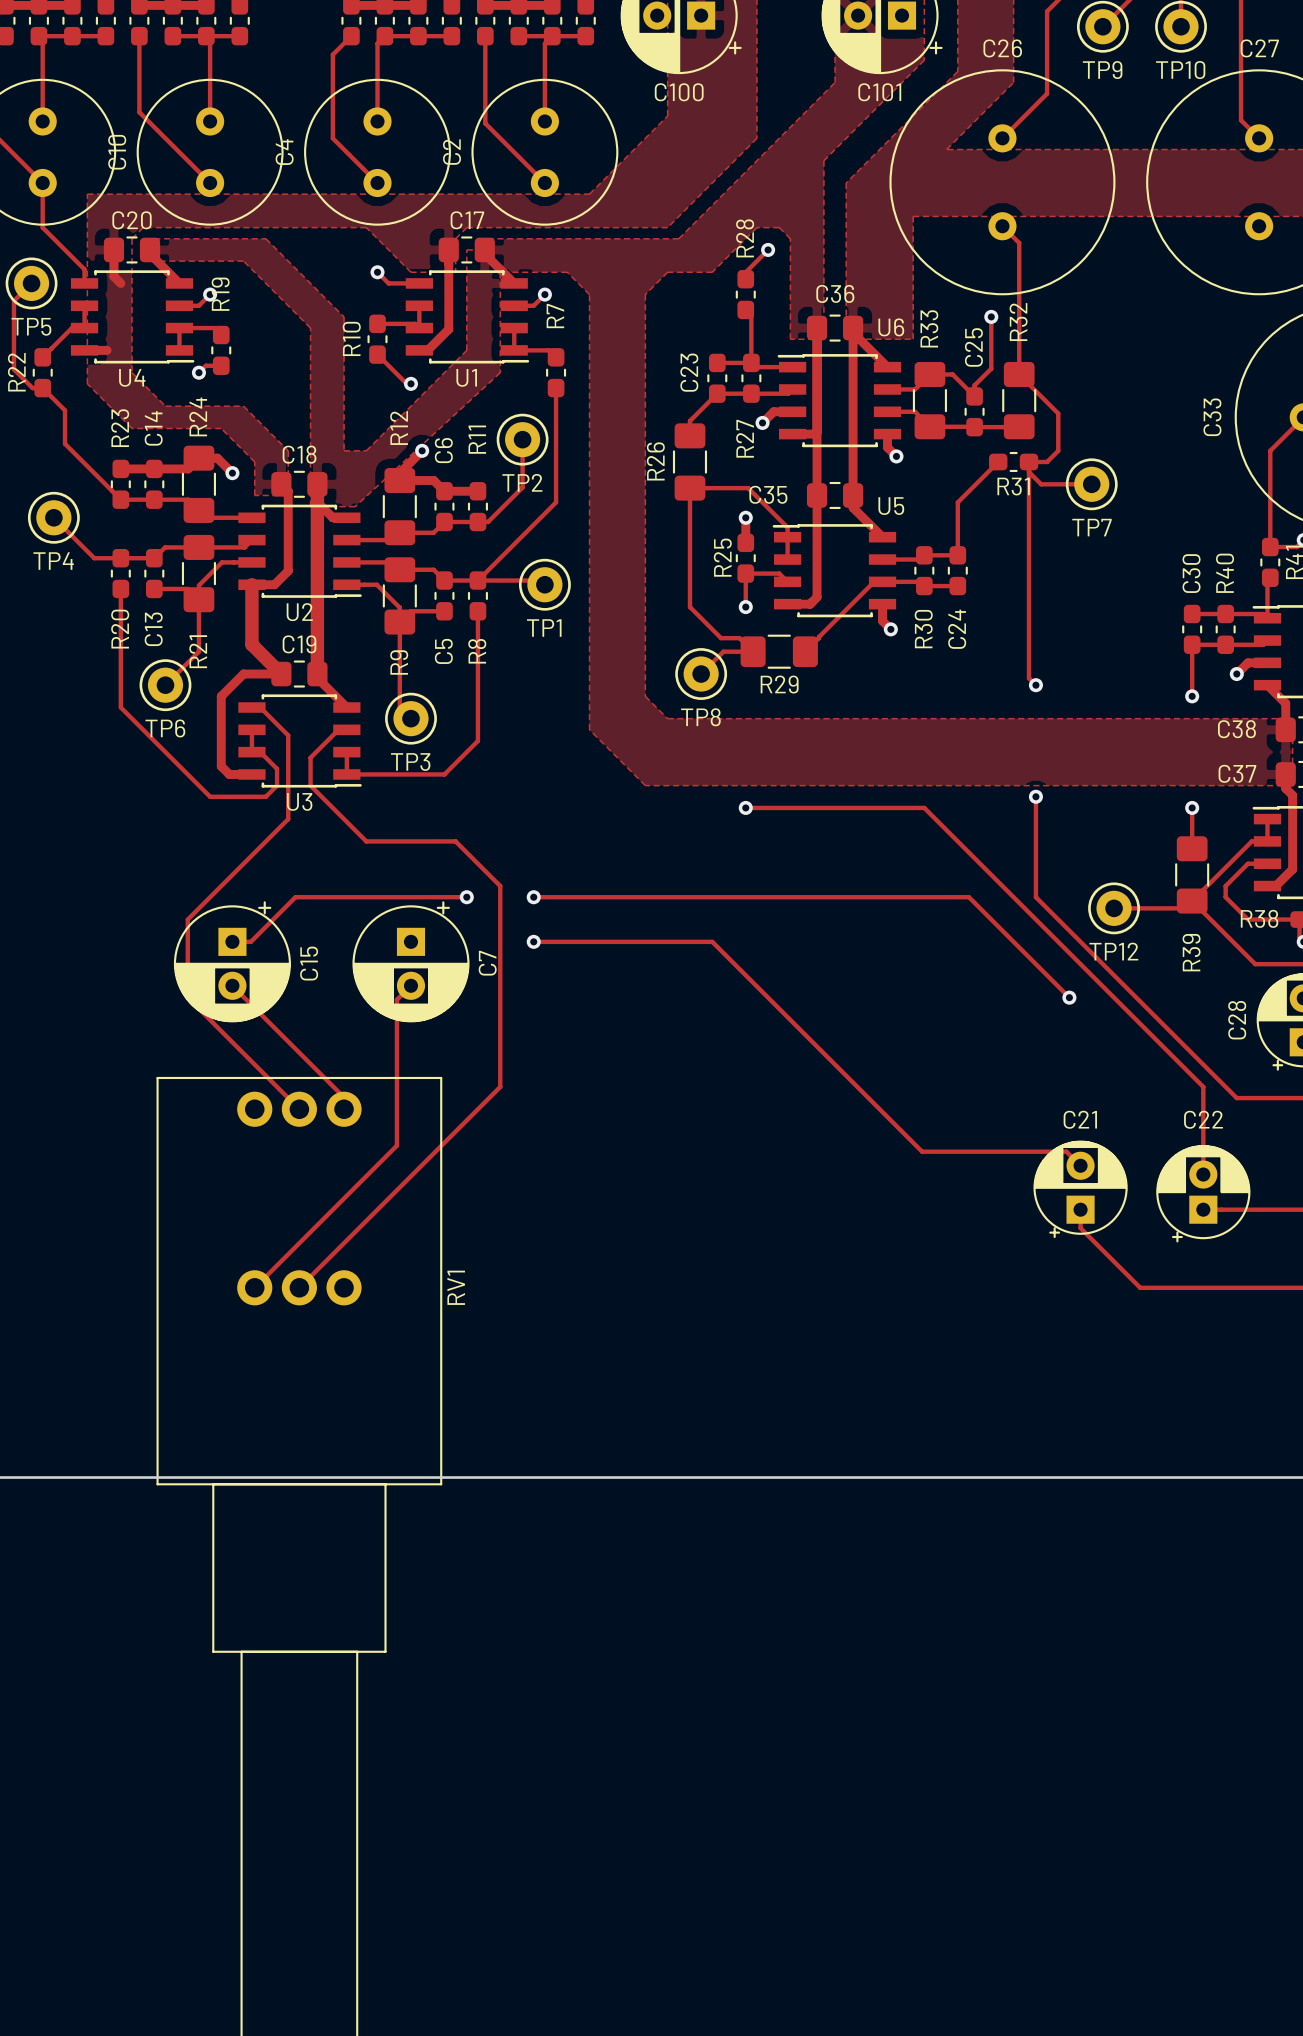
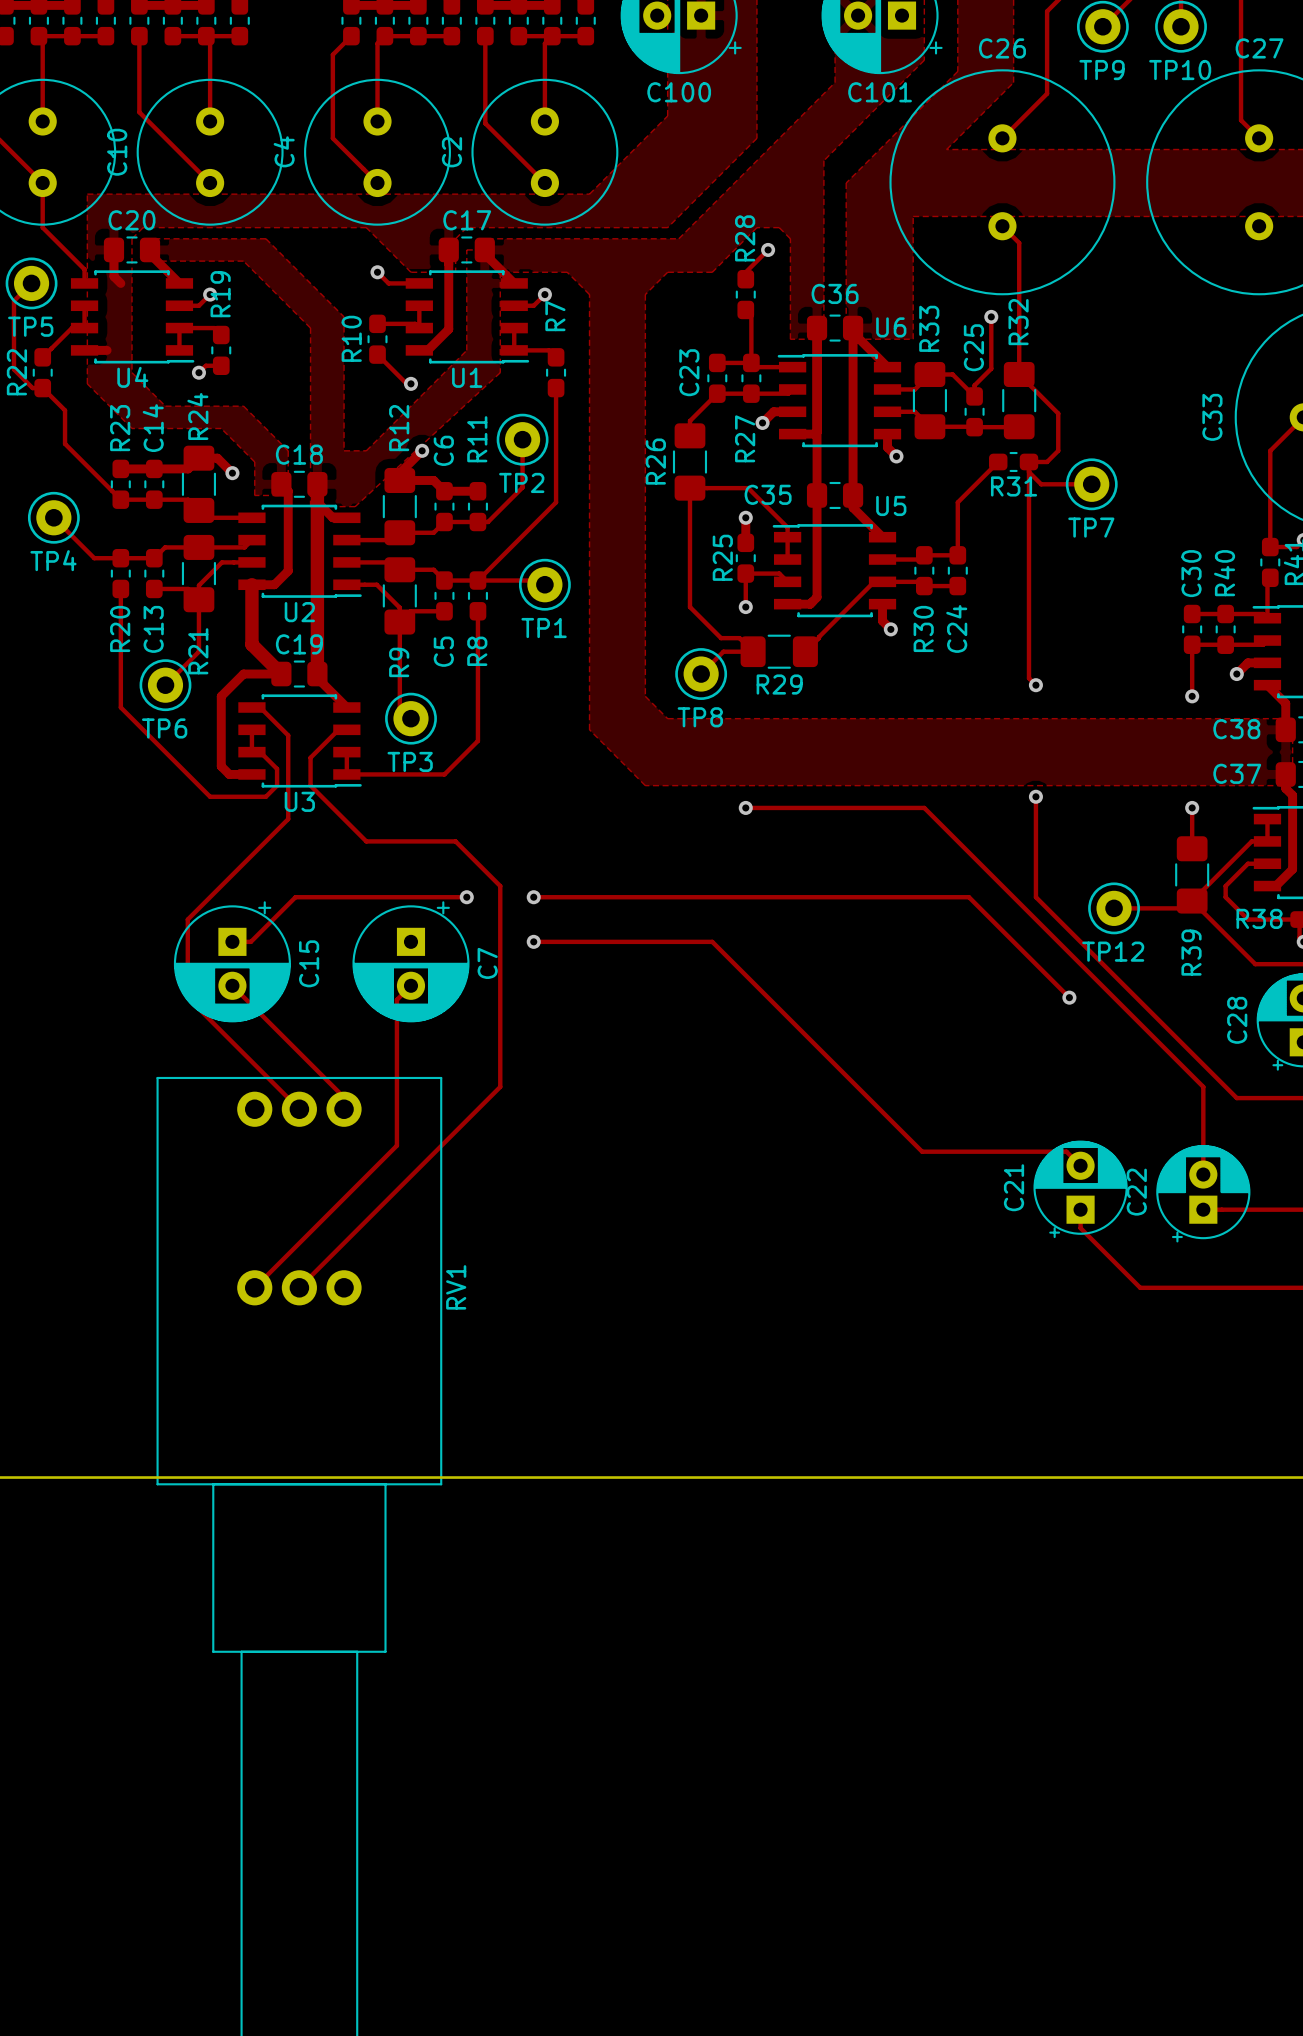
C21 name rotation: 0° (1080, 1119) -> 90° counterclockwise (1014, 1187)
C21 name position: C21 (1080, 1119) -> C21 (1014, 1187)
C22 name rotation: 0° (1203, 1119) -> 90° counterclockwise (1136, 1192)
C22 name position: C22 (1203, 1119) -> C22 (1136, 1192)

